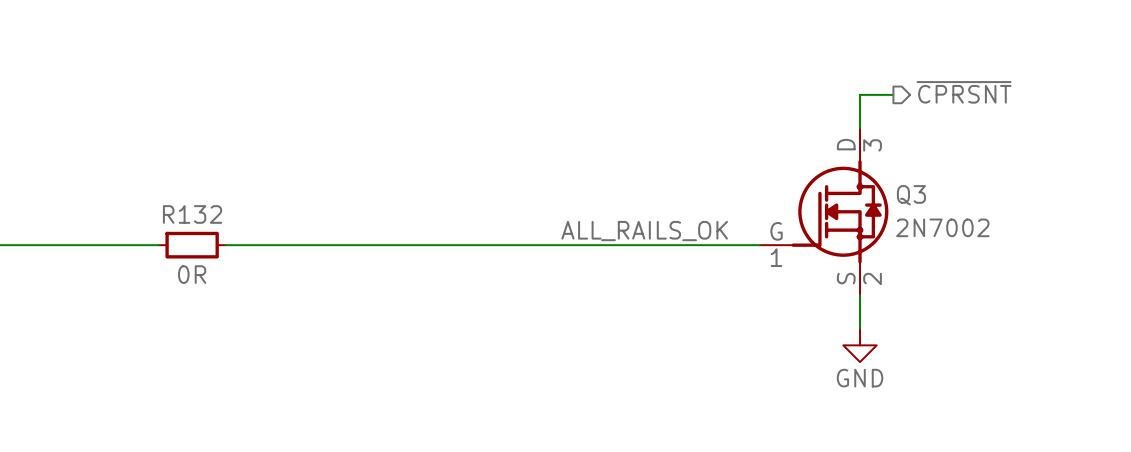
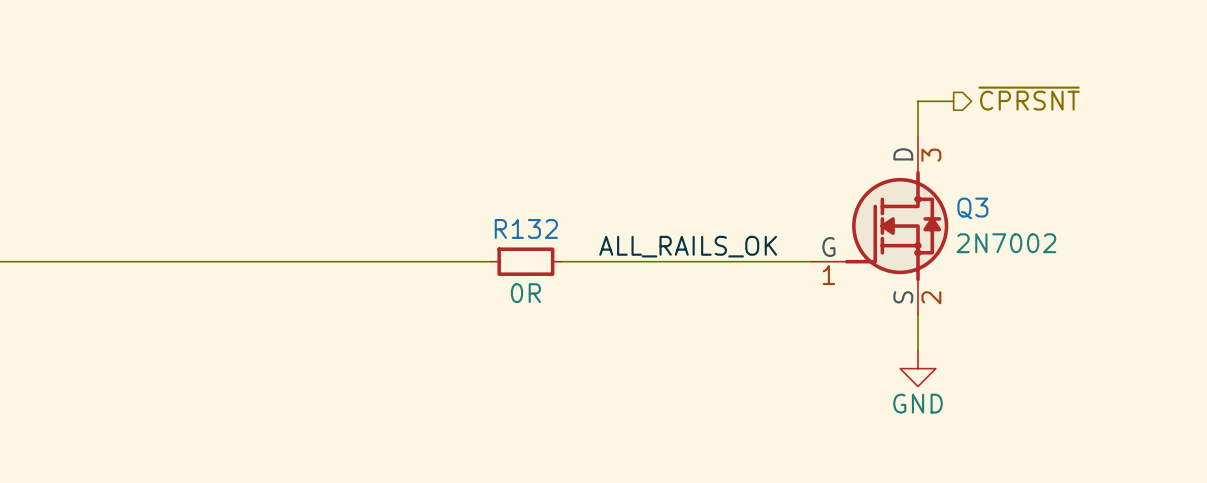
R132 position: (192, 245) -> (525, 261)
wire: (459, 245) (526, 245) -> (169, 261) (240, 261)

